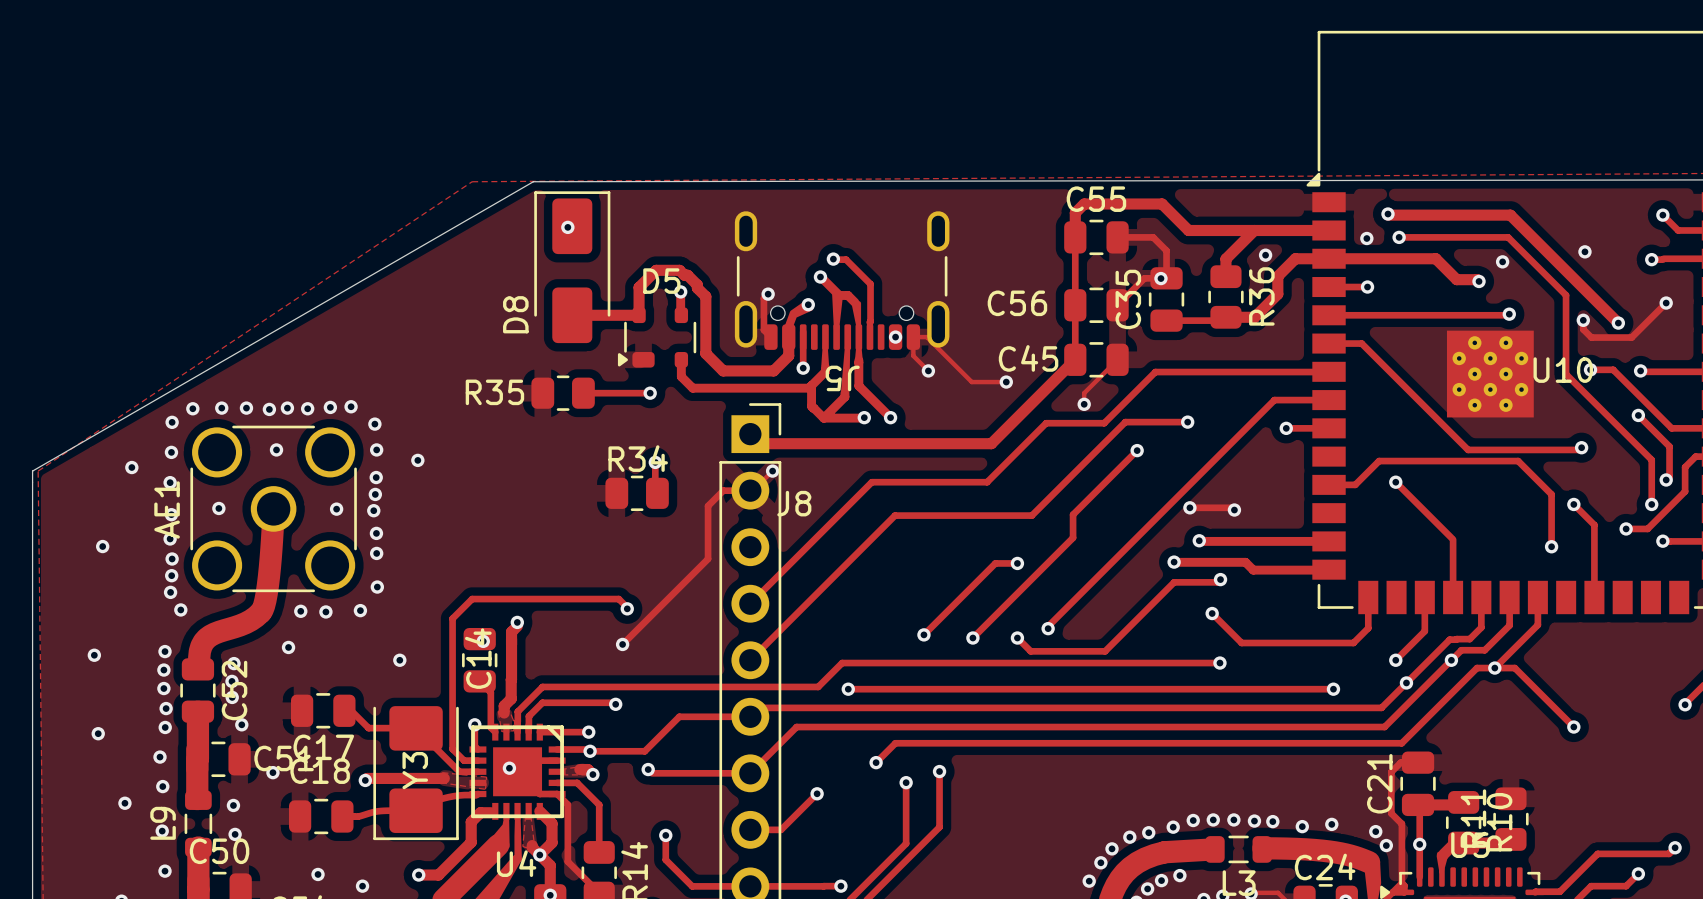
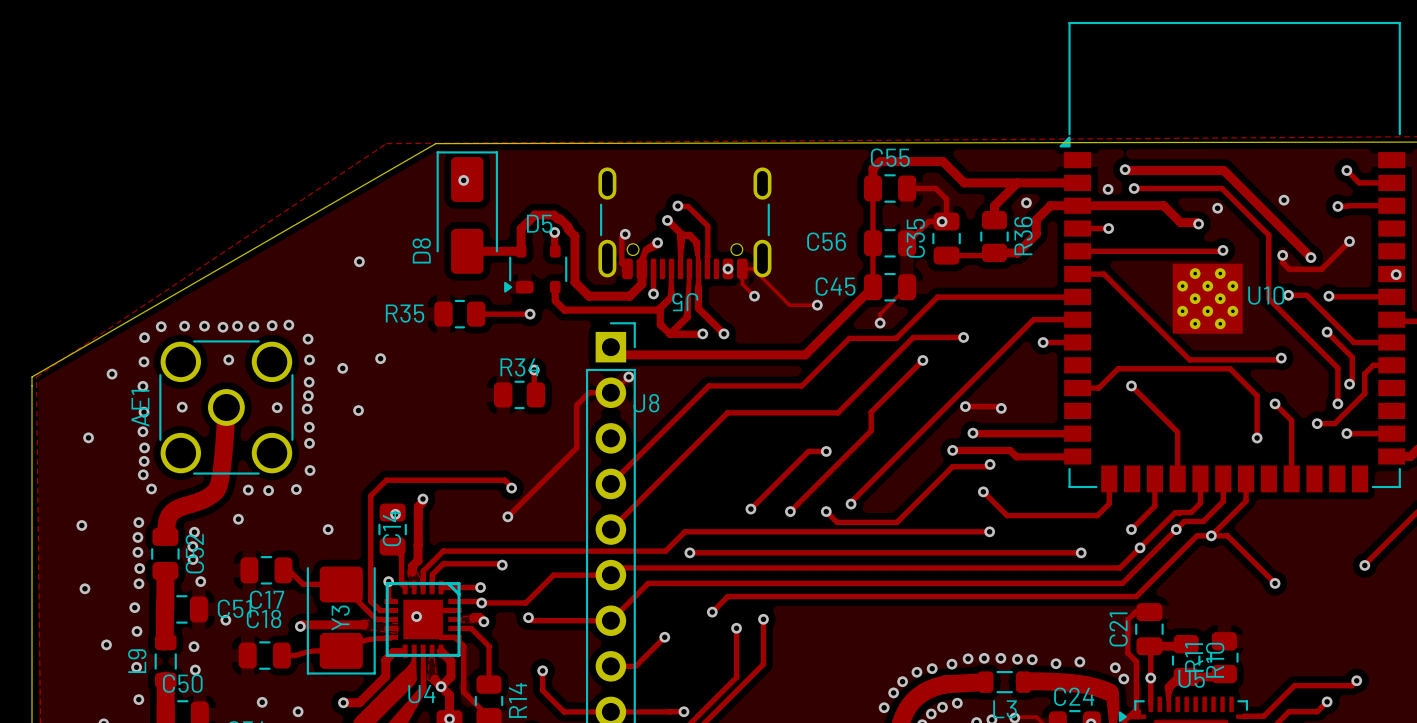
via: none -> (359, 261)
via: none -> (380, 358)
via: none -> (358, 410)

